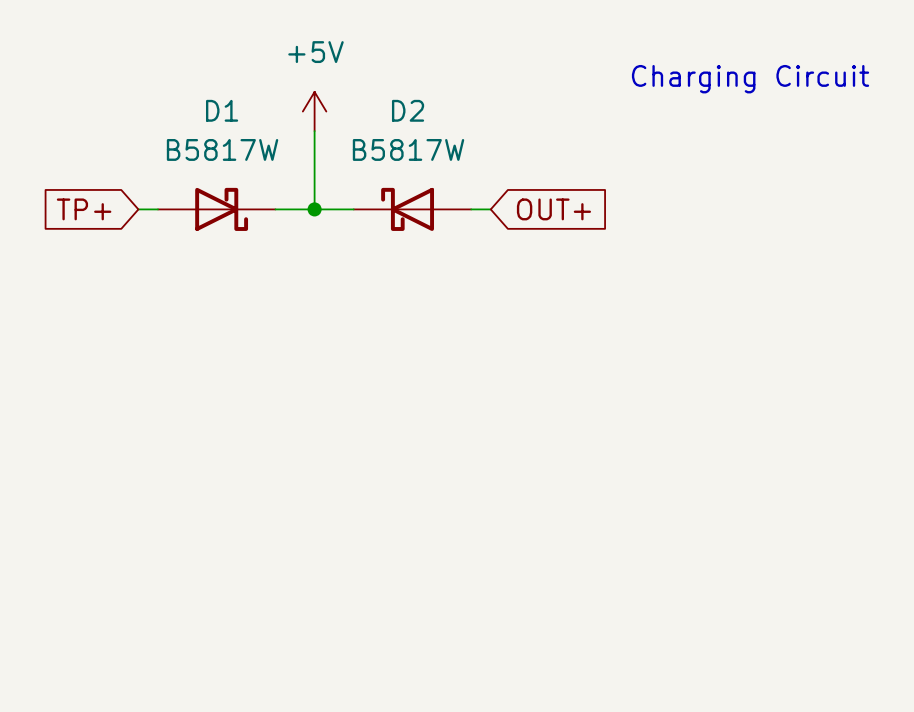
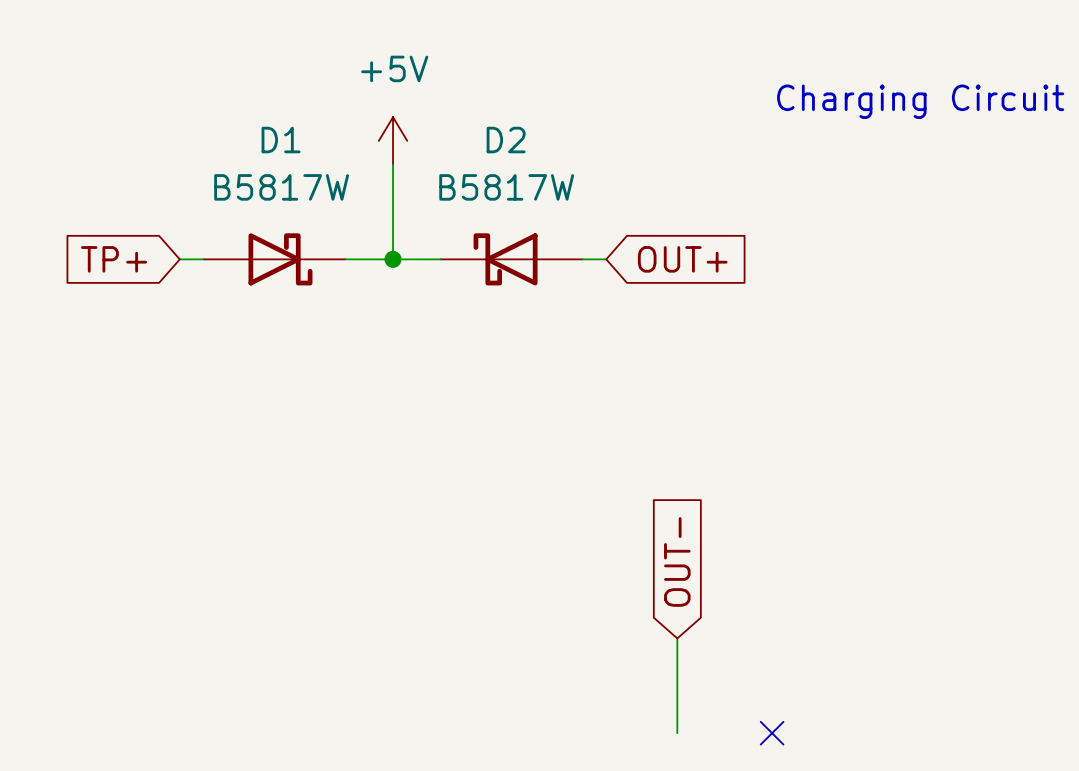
global label: none -> OUT- (677, 561)
wire: none -> (677, 638) (677, 733)
no-connect mark: none -> (772, 733)

